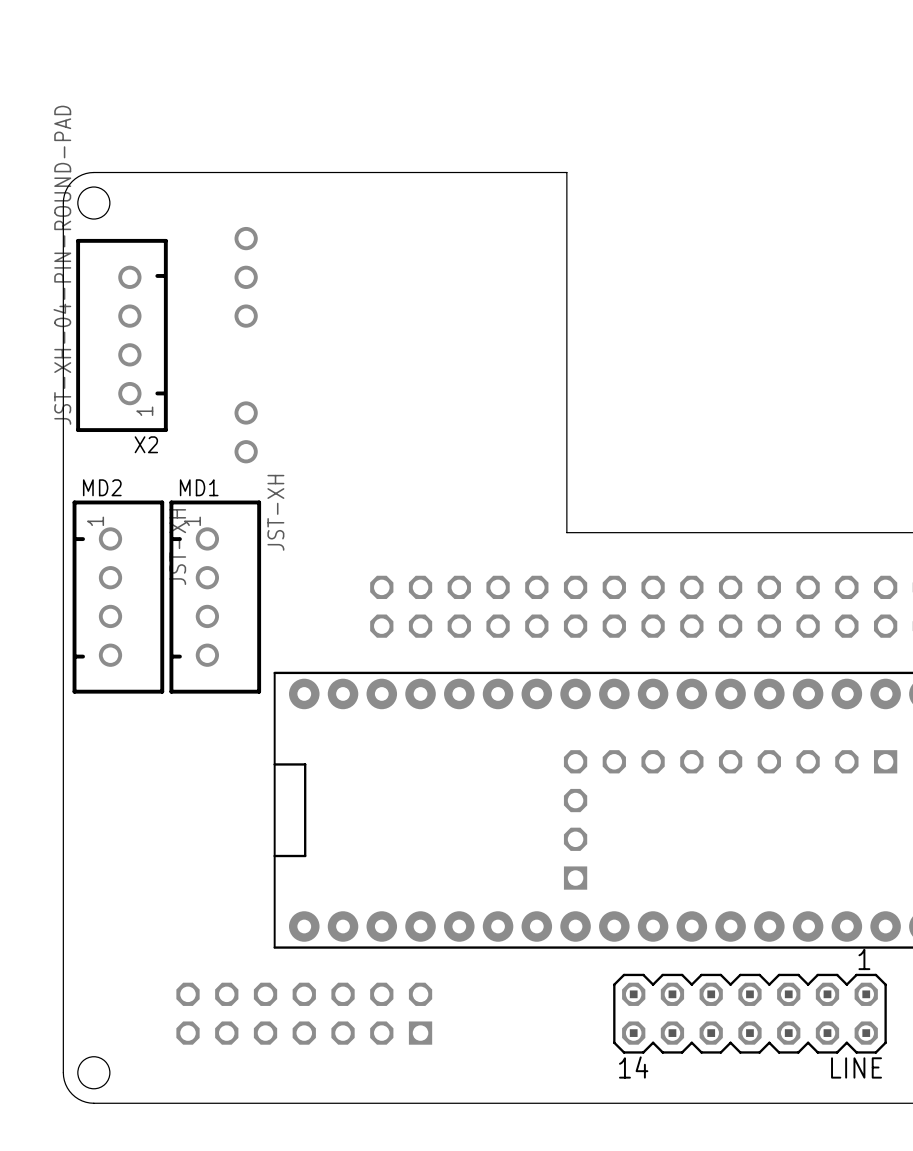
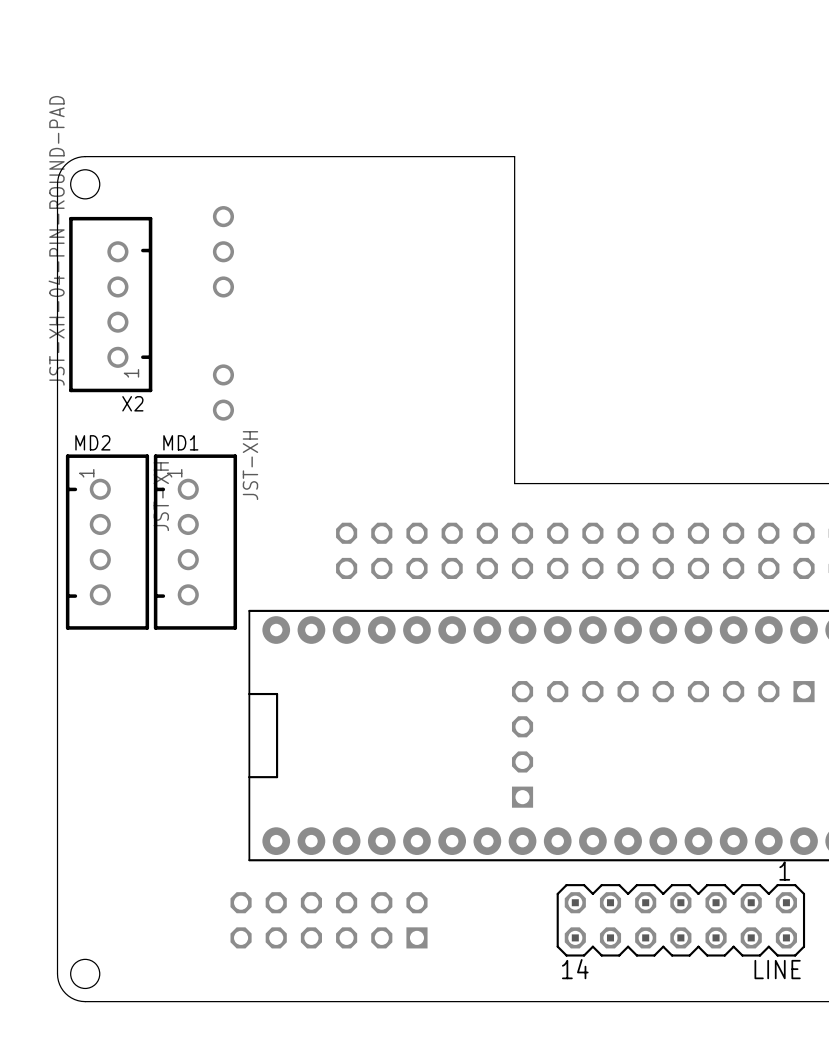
part: (304, 1013) -> none
part: none -> (329, 920)

